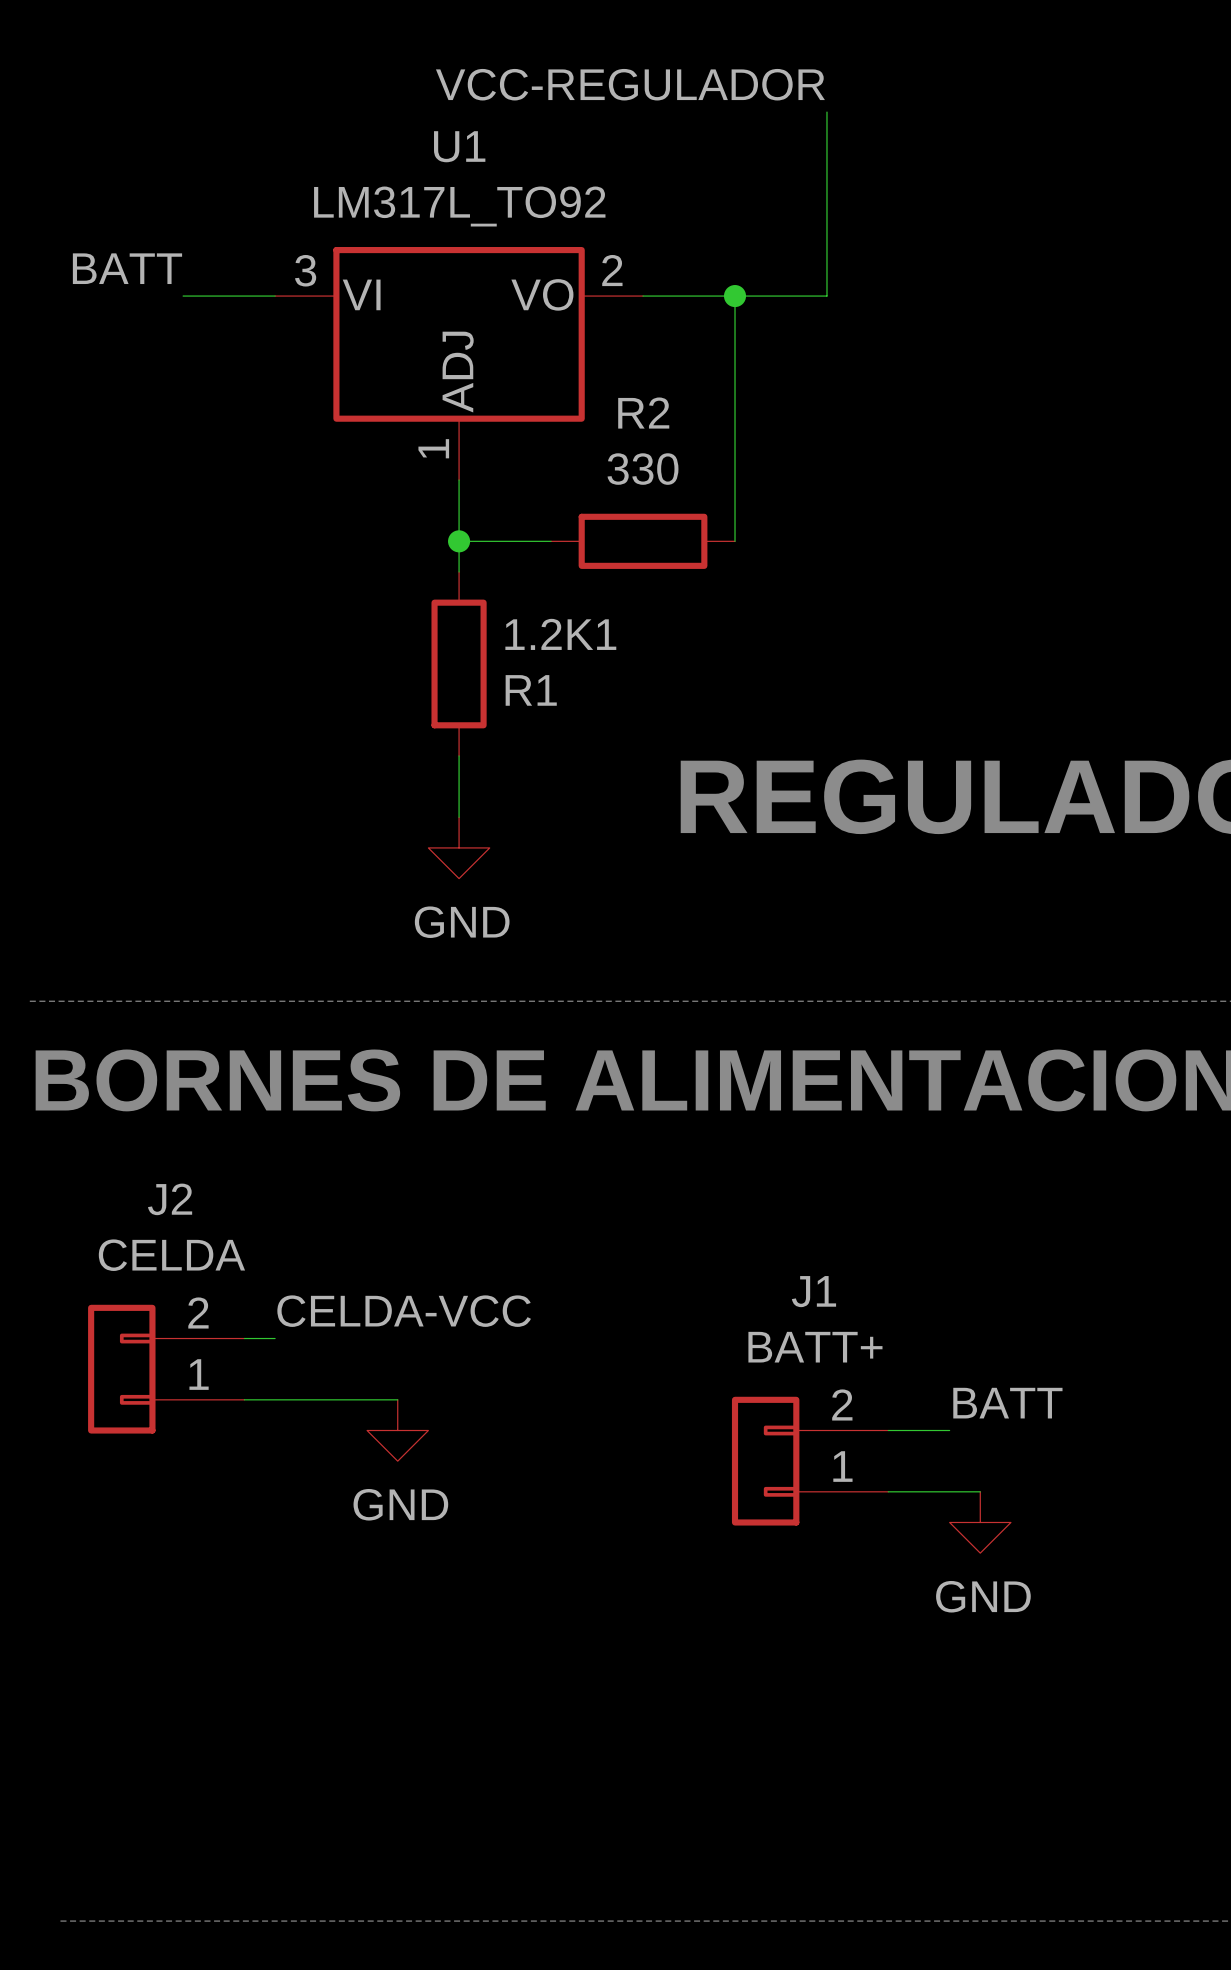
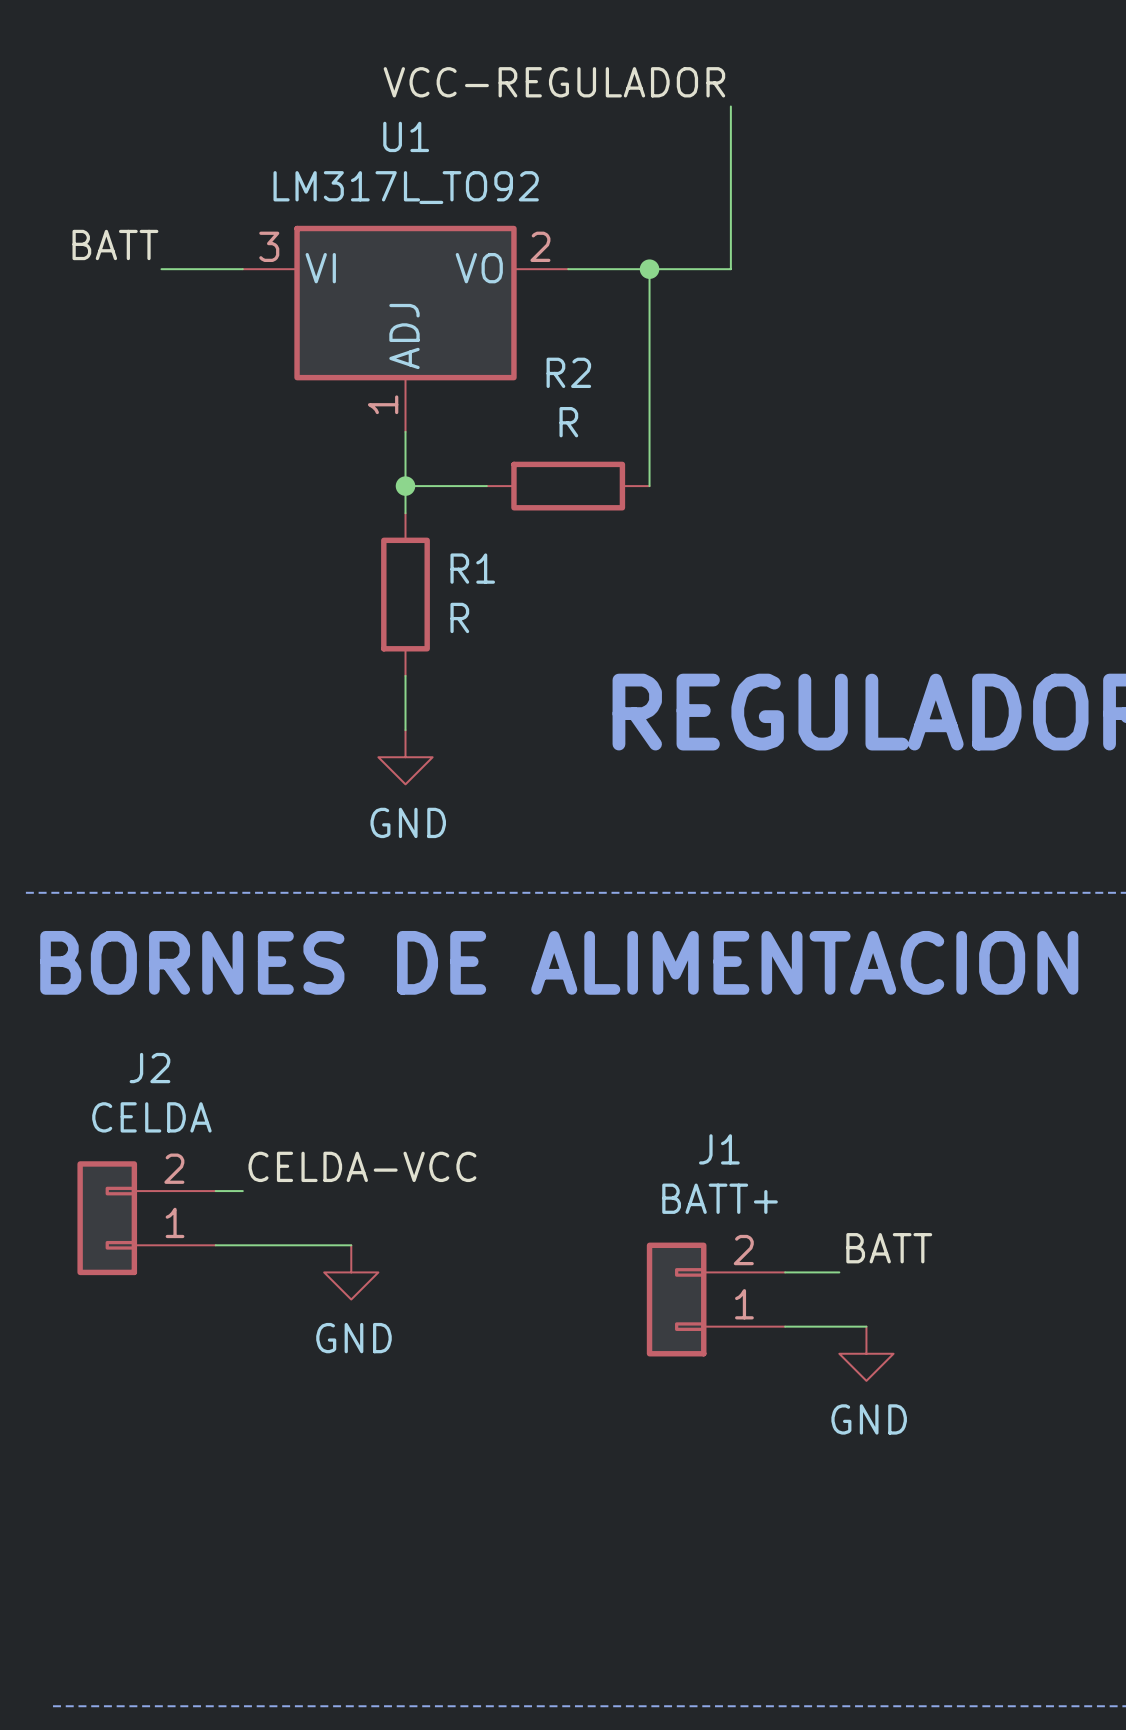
R2 value: 330 (643, 469) -> R (568, 422)
1.2K1 name: 1.2K1 (560, 634) -> R1 (472, 568)
1.2K1 value: R1 (531, 690) -> R (459, 617)

